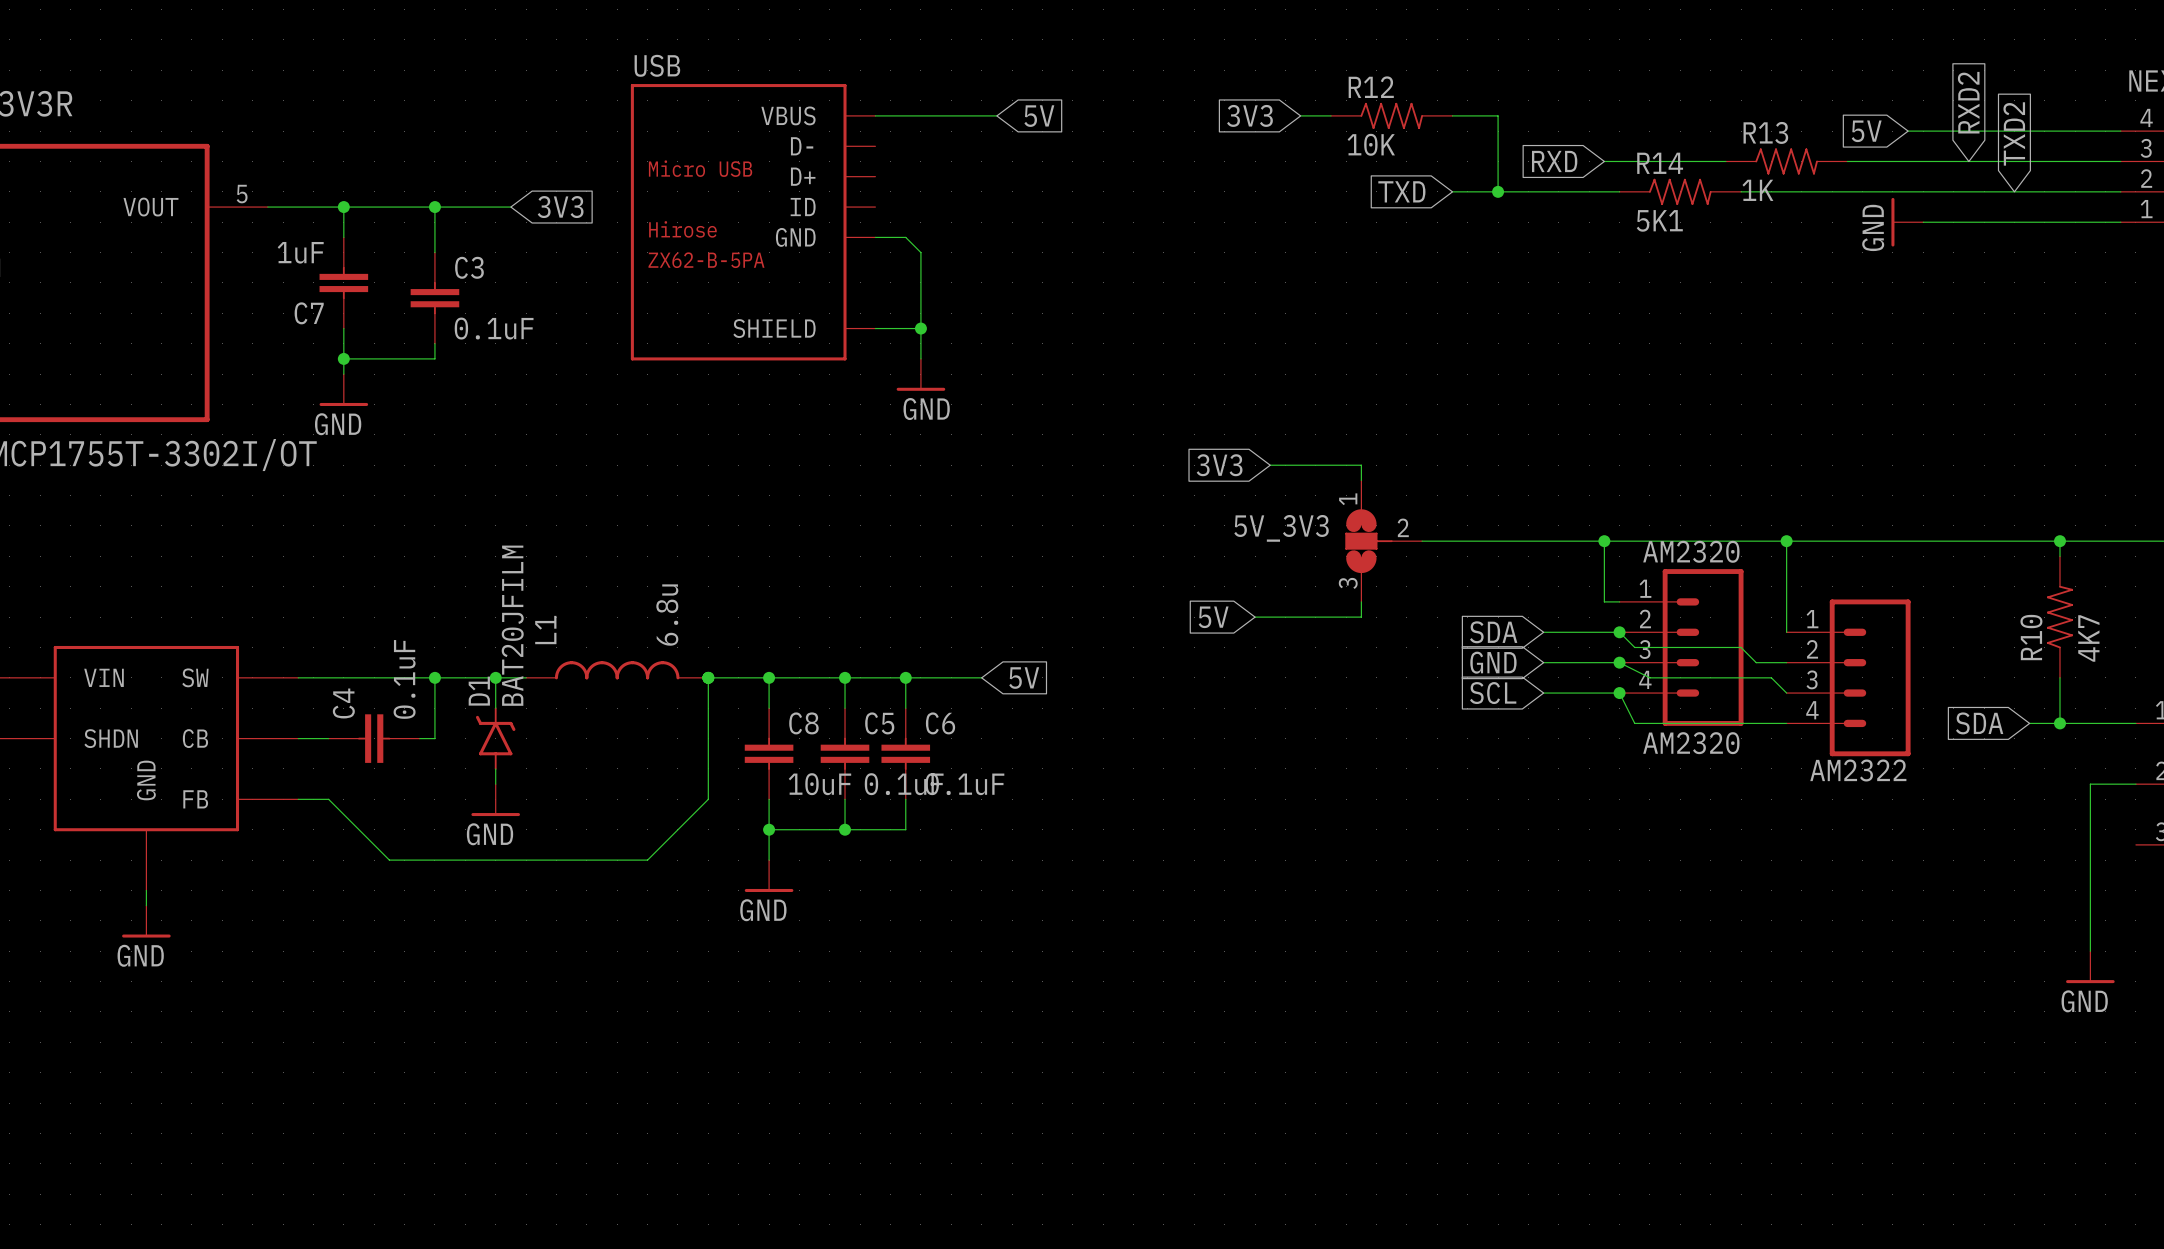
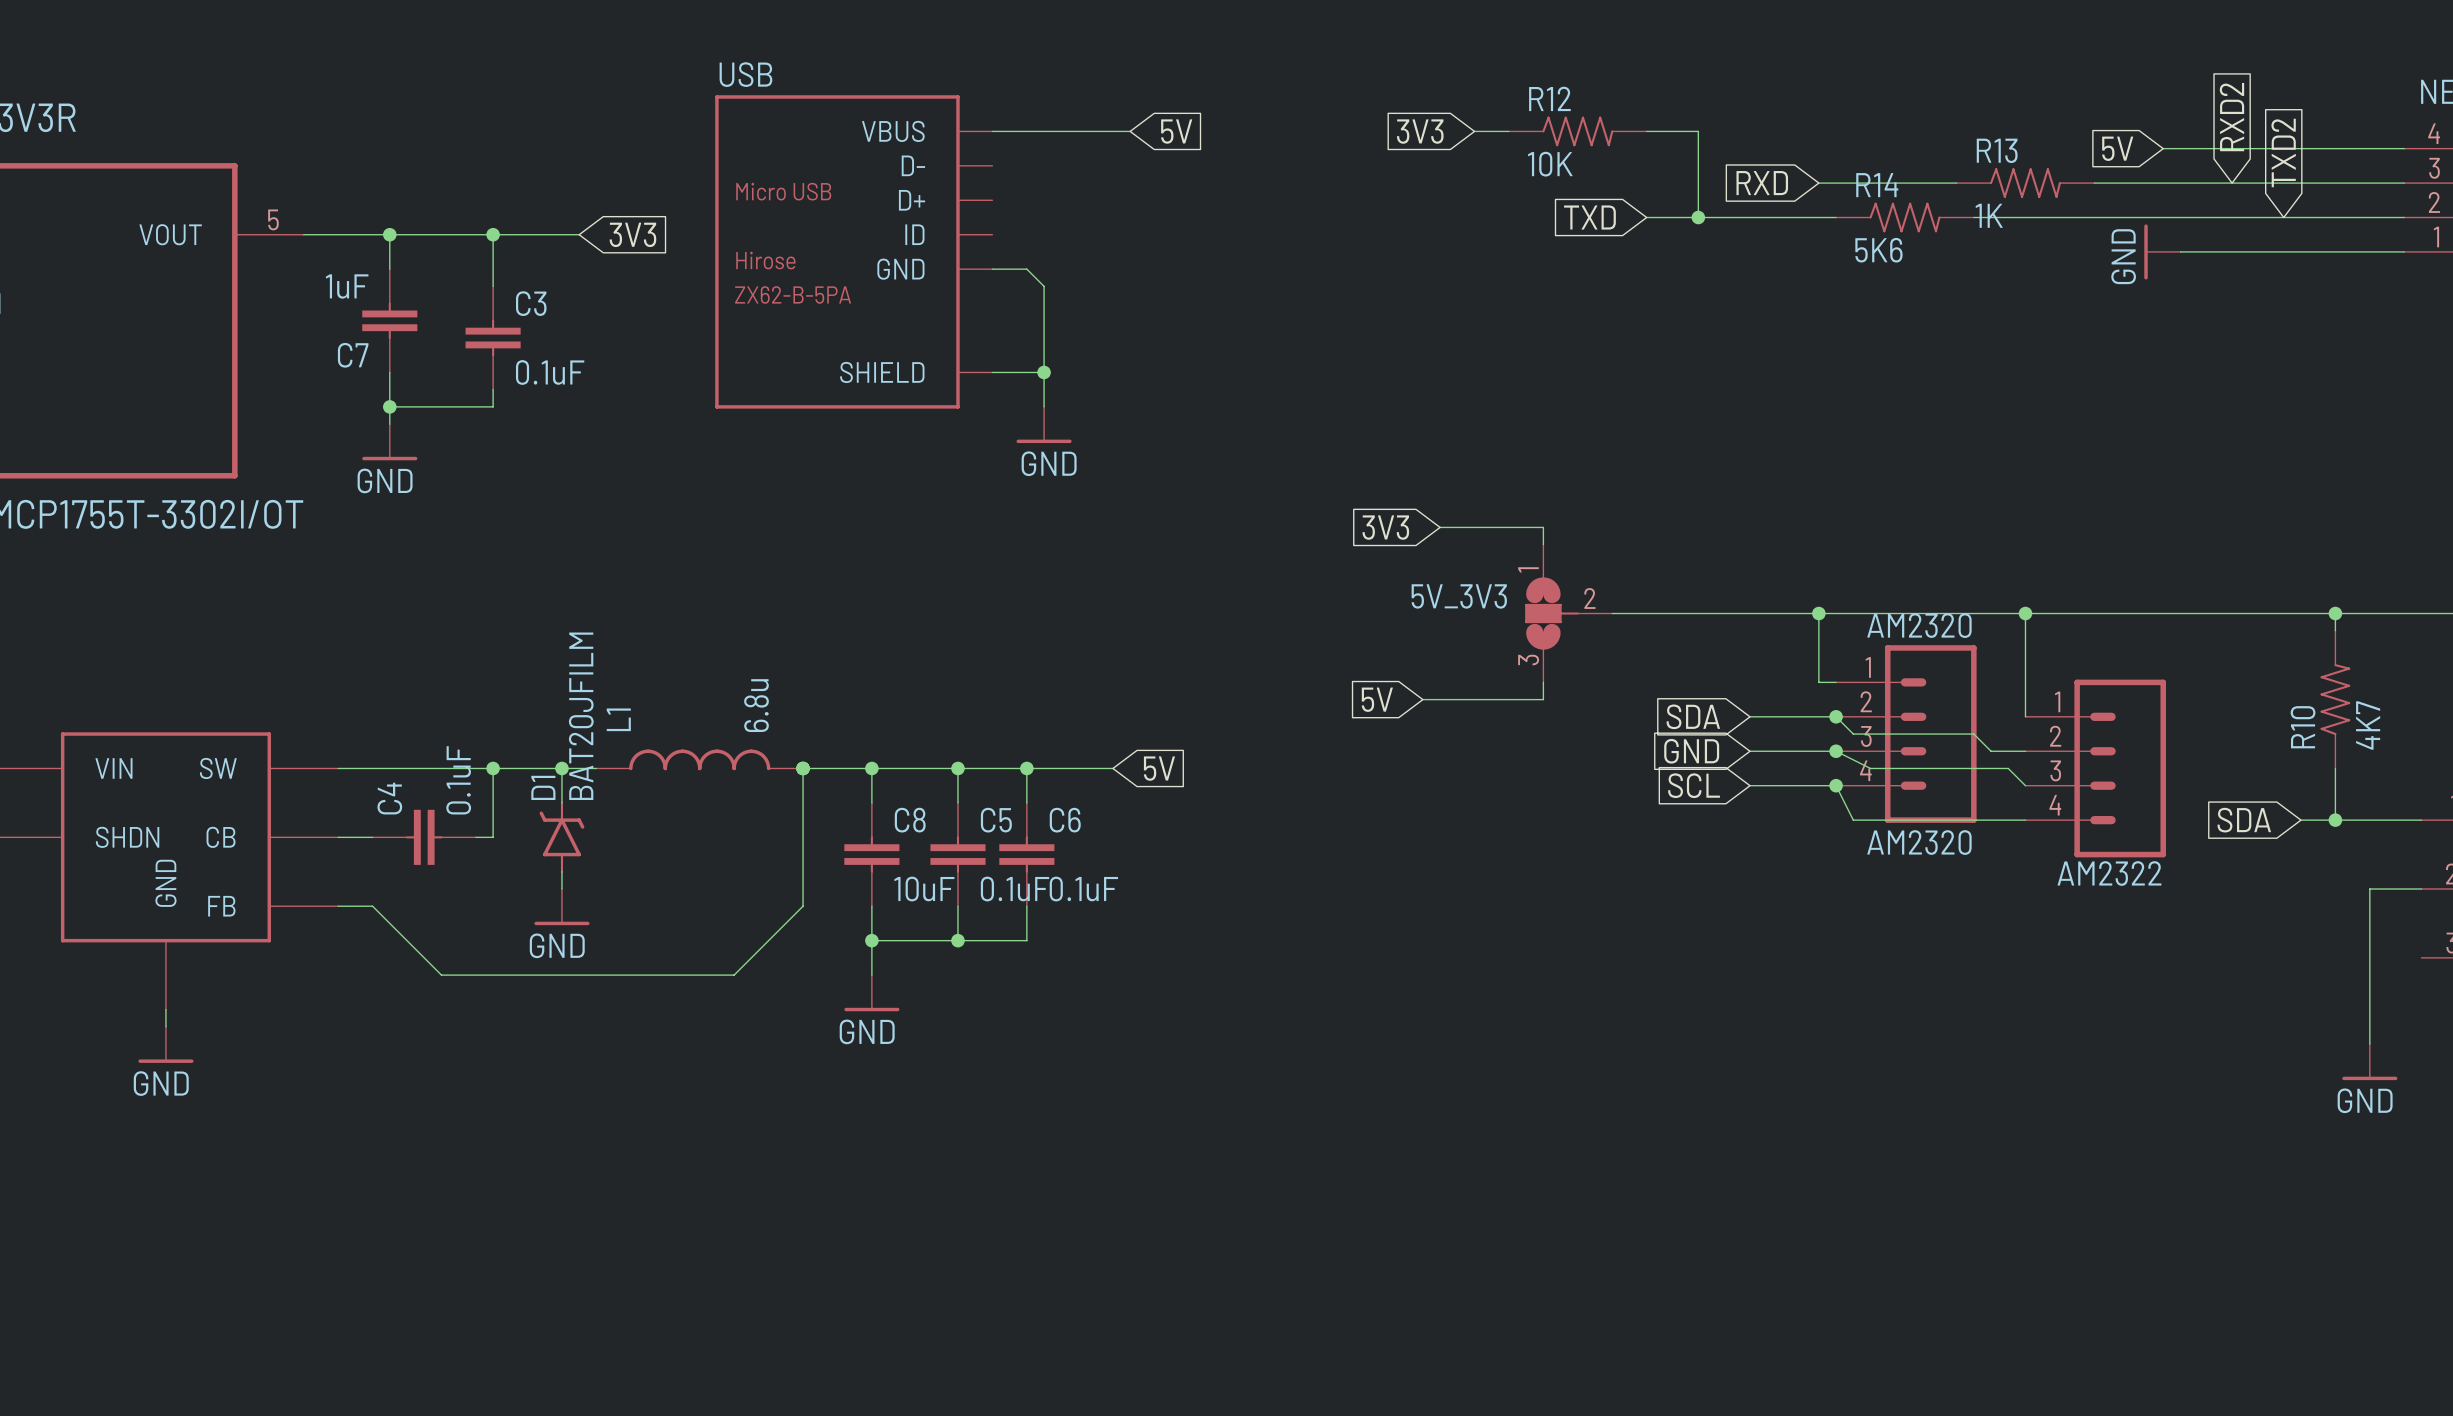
R14 value: 5K1 (1659, 220) -> 5K6 (1878, 250)
power symbol position: GND (2090, 967) -> GND (2369, 1062)

